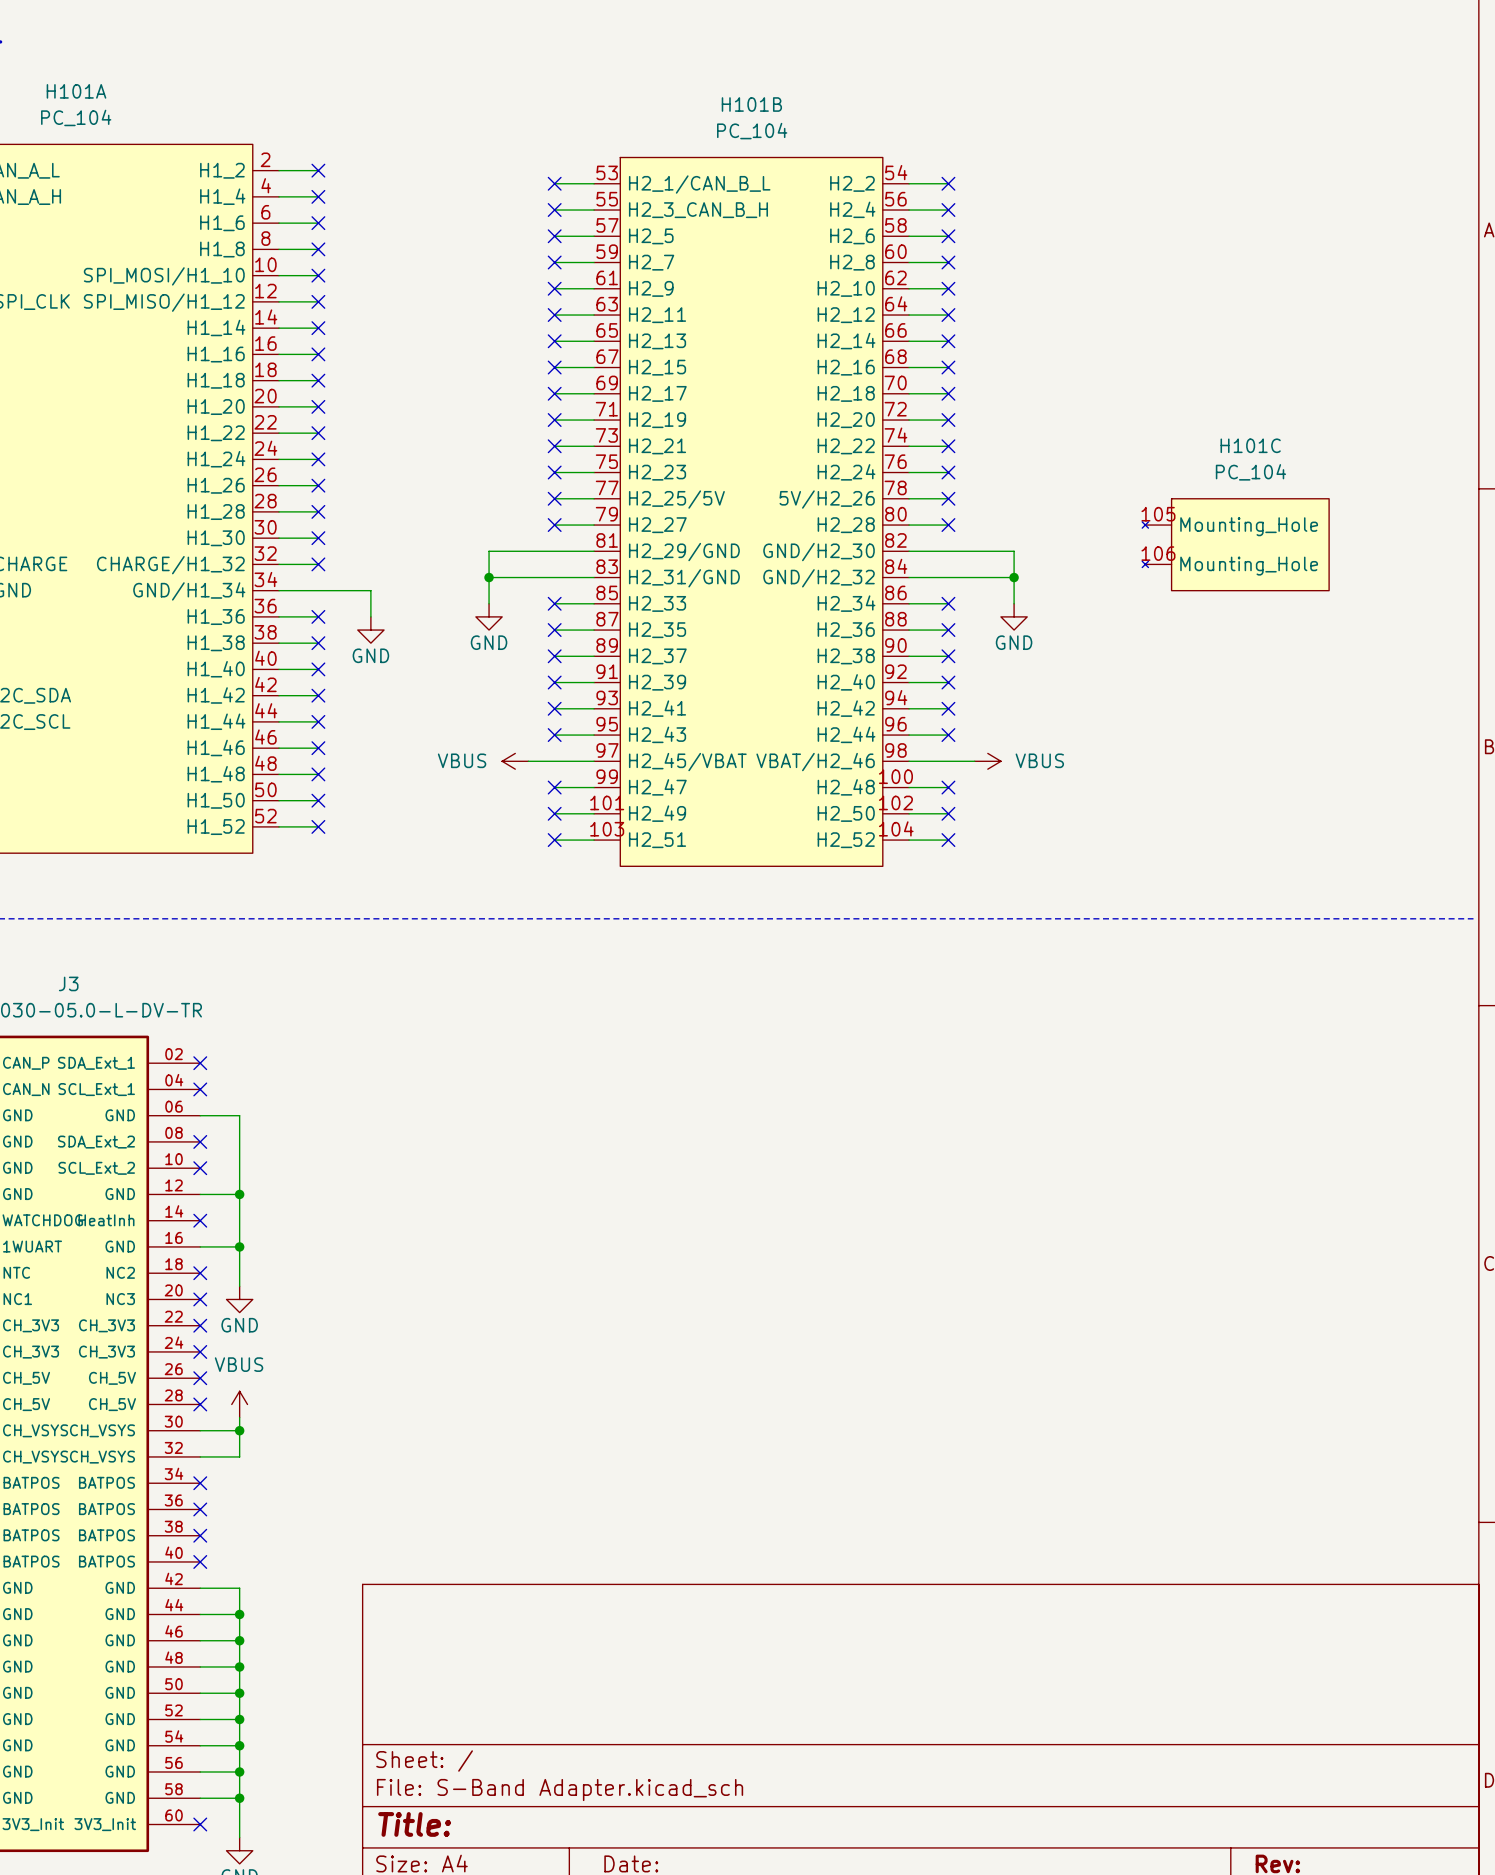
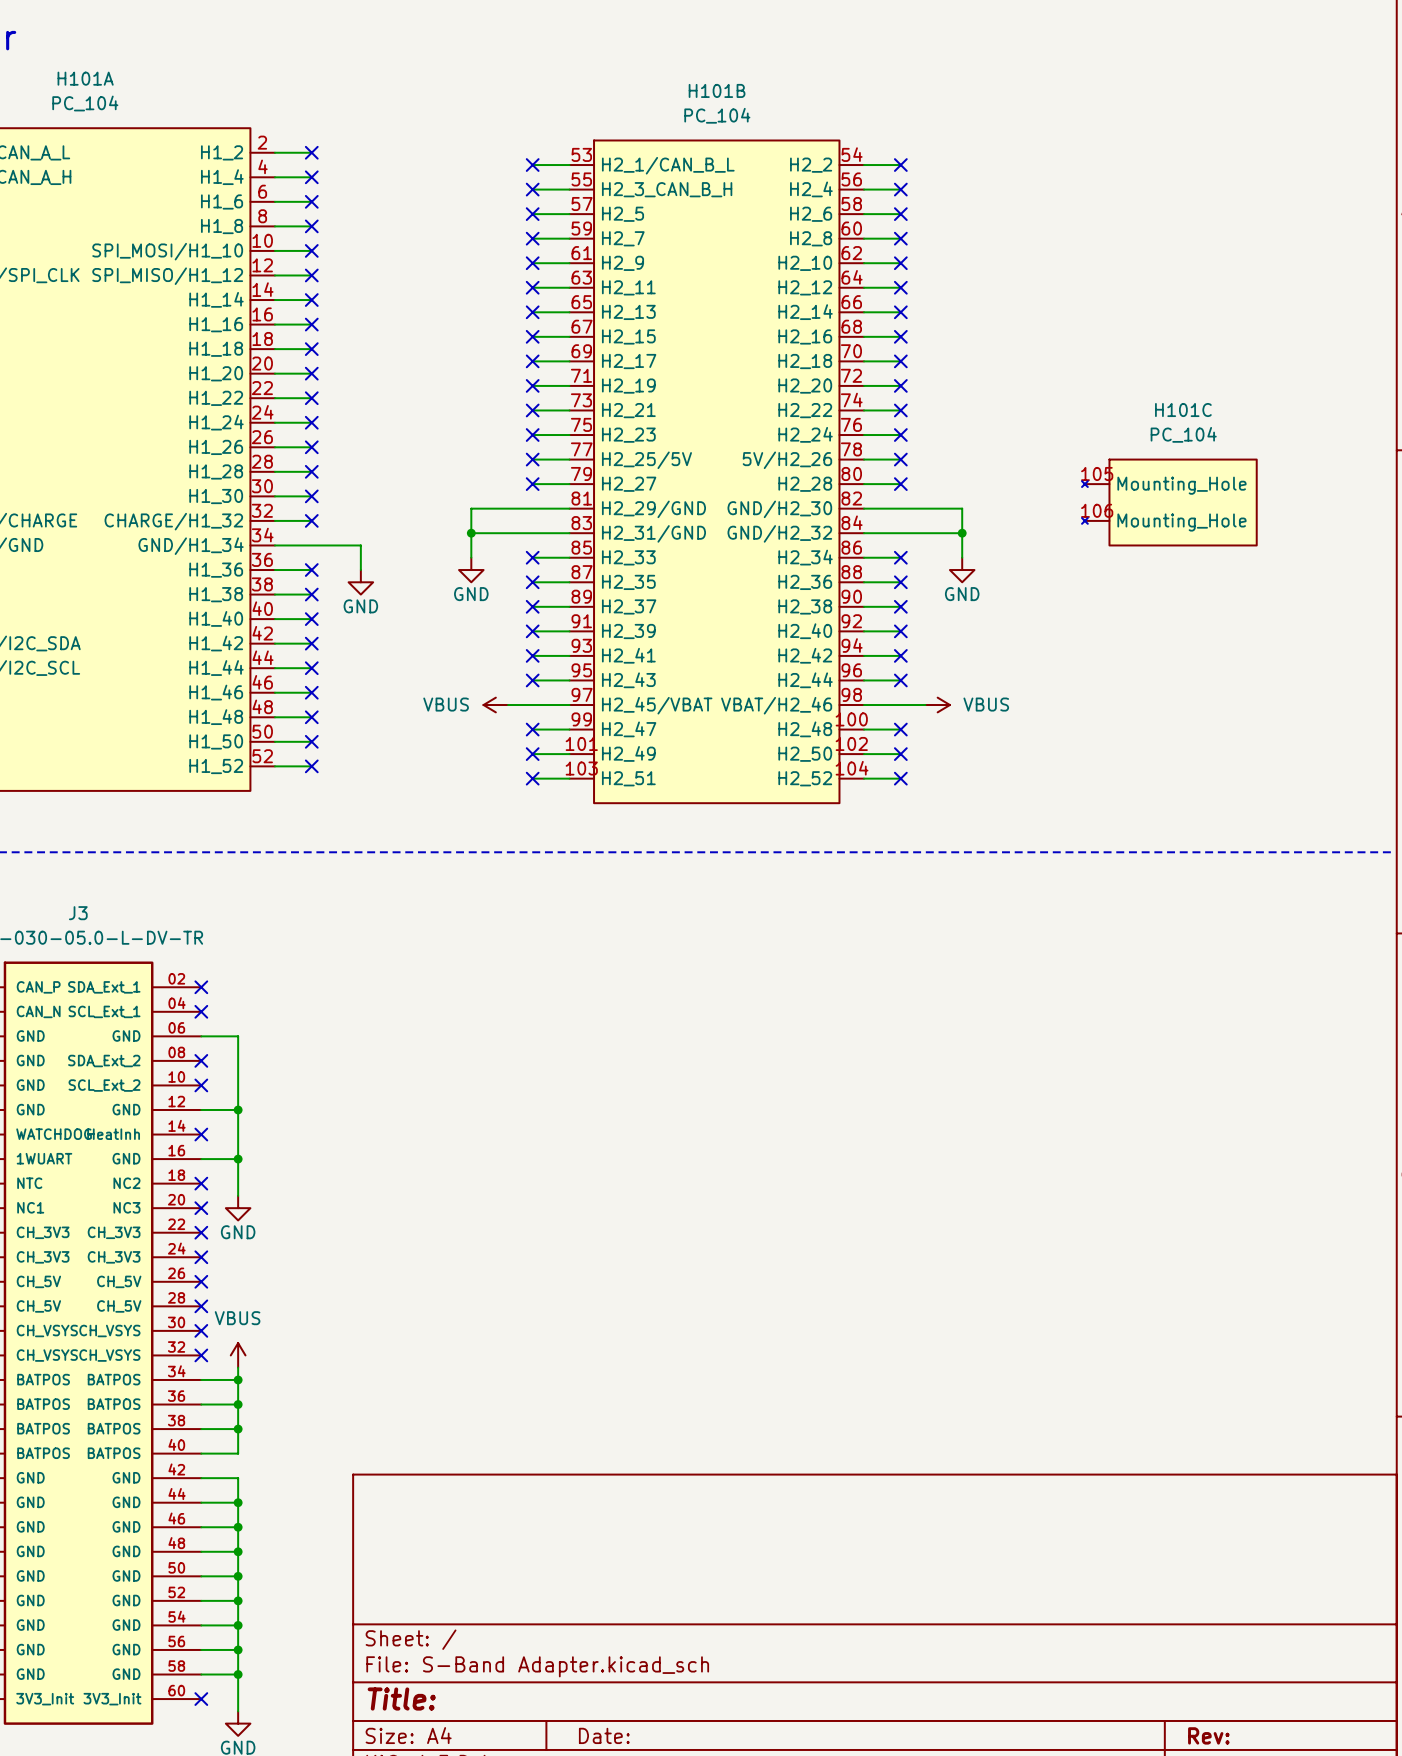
power symbol position: VBUS (239, 1404) -> VBUS (238, 1355)
wire: (239, 1417) (239, 1456) (200, 1456) -> none
wire: (200, 1430) (239, 1430) -> (201, 1379) (238, 1379)
no-connect mark: none -> (201, 1330)
junction: (239, 1430) -> none
no-connect mark: none -> (201, 1355)
wire: none -> (238, 1367) (238, 1453) (201, 1453)
no-connect mark: (200, 1483) -> none
junction: none -> (238, 1379)
wire: none -> (201, 1404) (238, 1404)
no-connect mark: (200, 1509) -> none
junction: none -> (238, 1404)
wire: none -> (201, 1429) (238, 1429)
no-connect mark: (200, 1535) -> none
junction: none -> (238, 1429)
no-connect mark: (200, 1561) -> none

